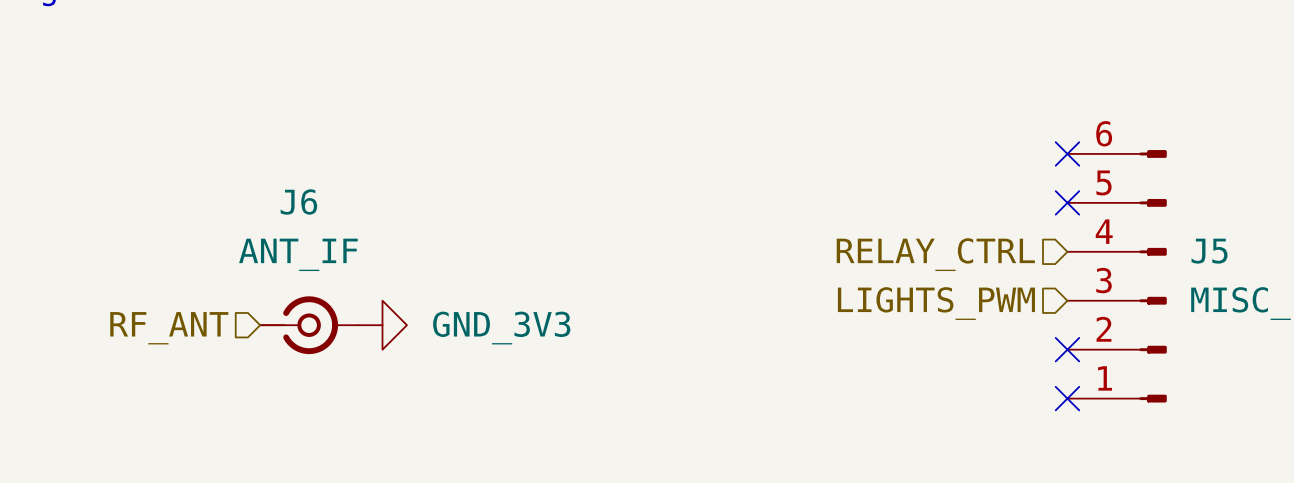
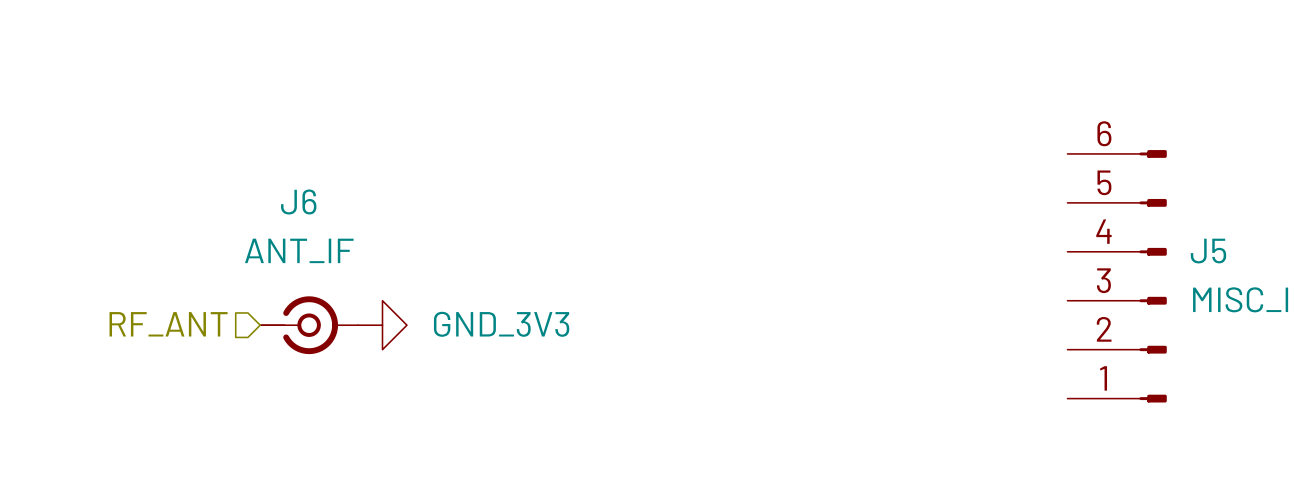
no-connect mark: (1067, 153) -> none
no-connect mark: (1067, 202) -> none
hierarchical label: RELAY_CTRL (935, 254) -> none
hierarchical label: LIGHTS_PWM (936, 303) -> none
no-connect mark: (1067, 349) -> none
no-connect mark: (1067, 398) -> none

